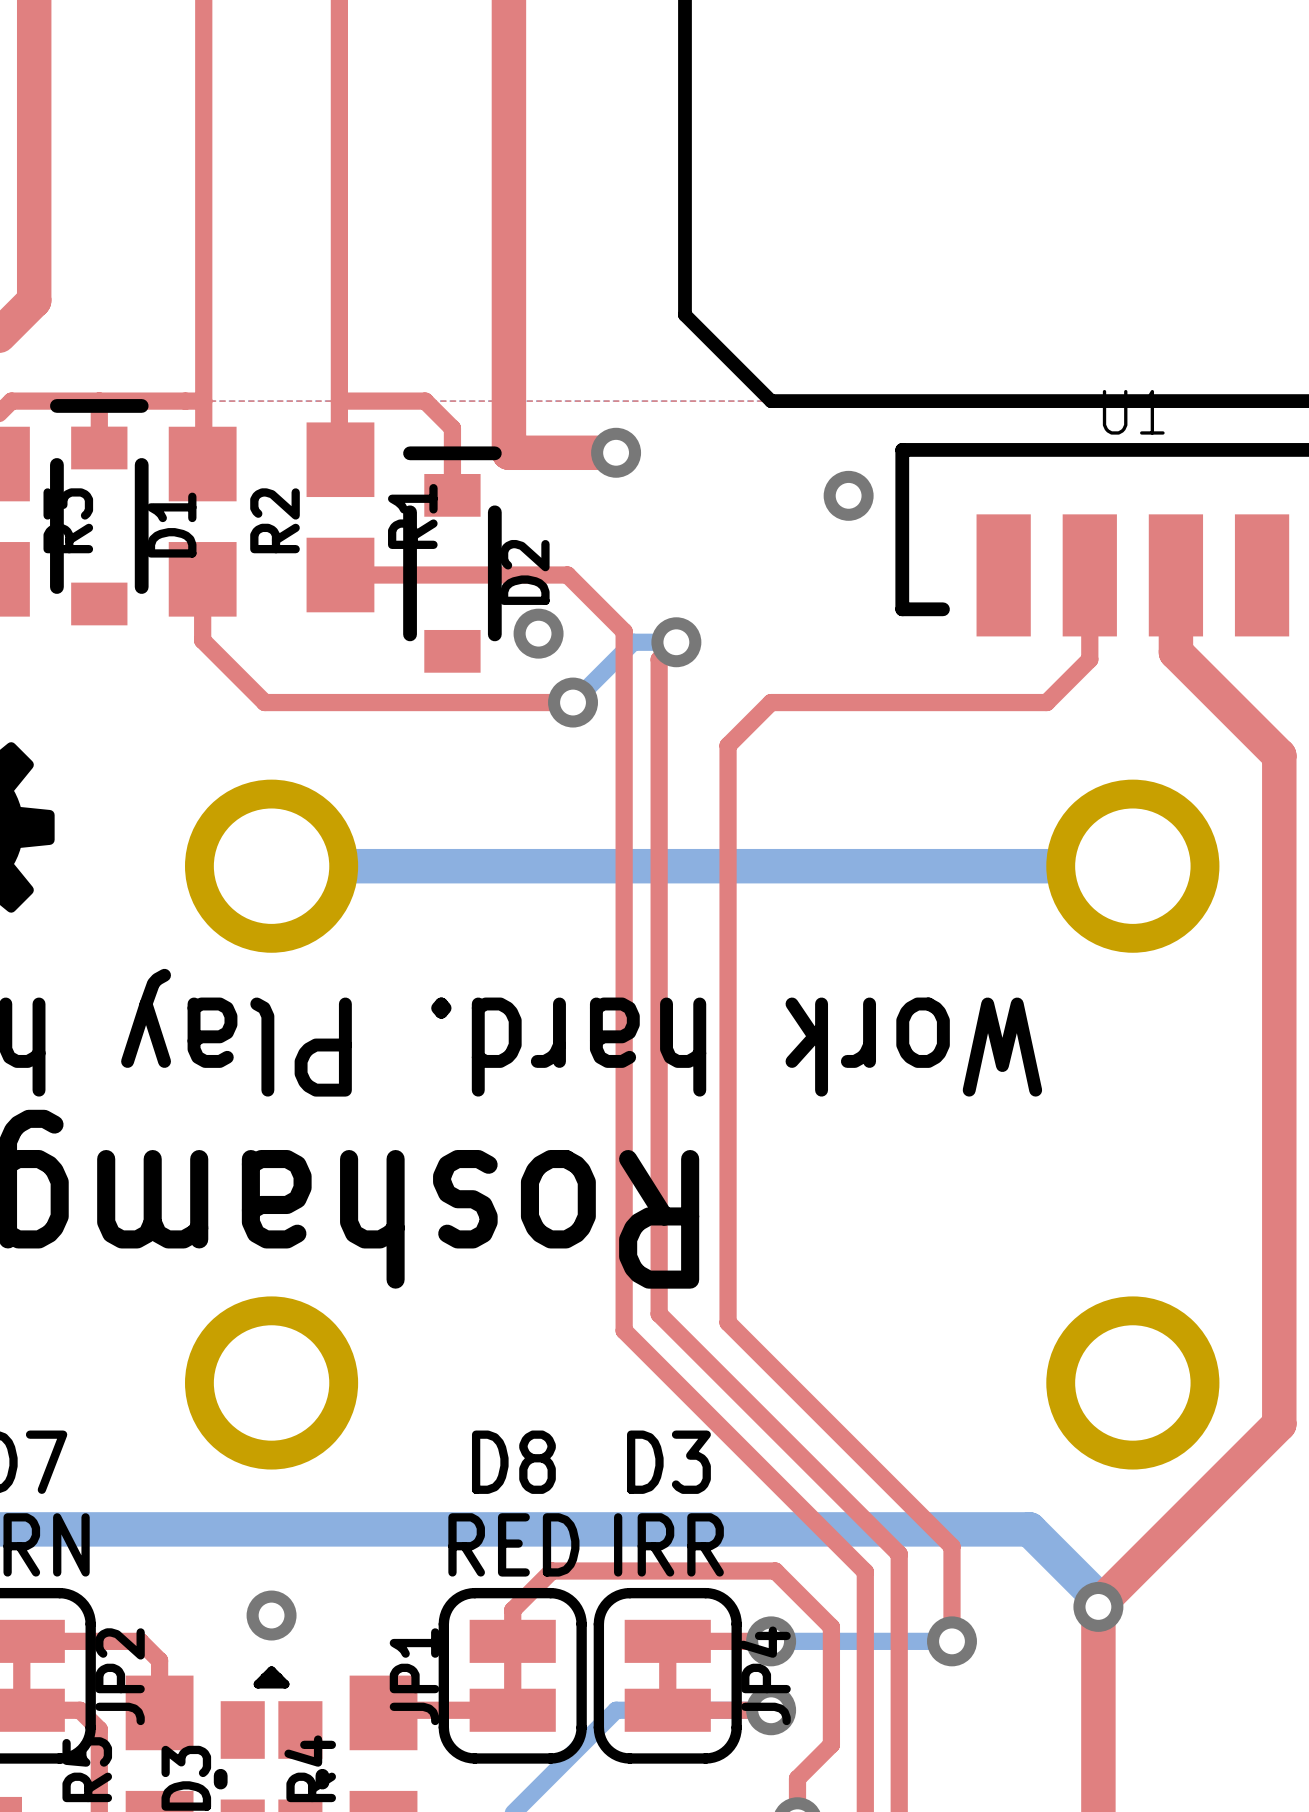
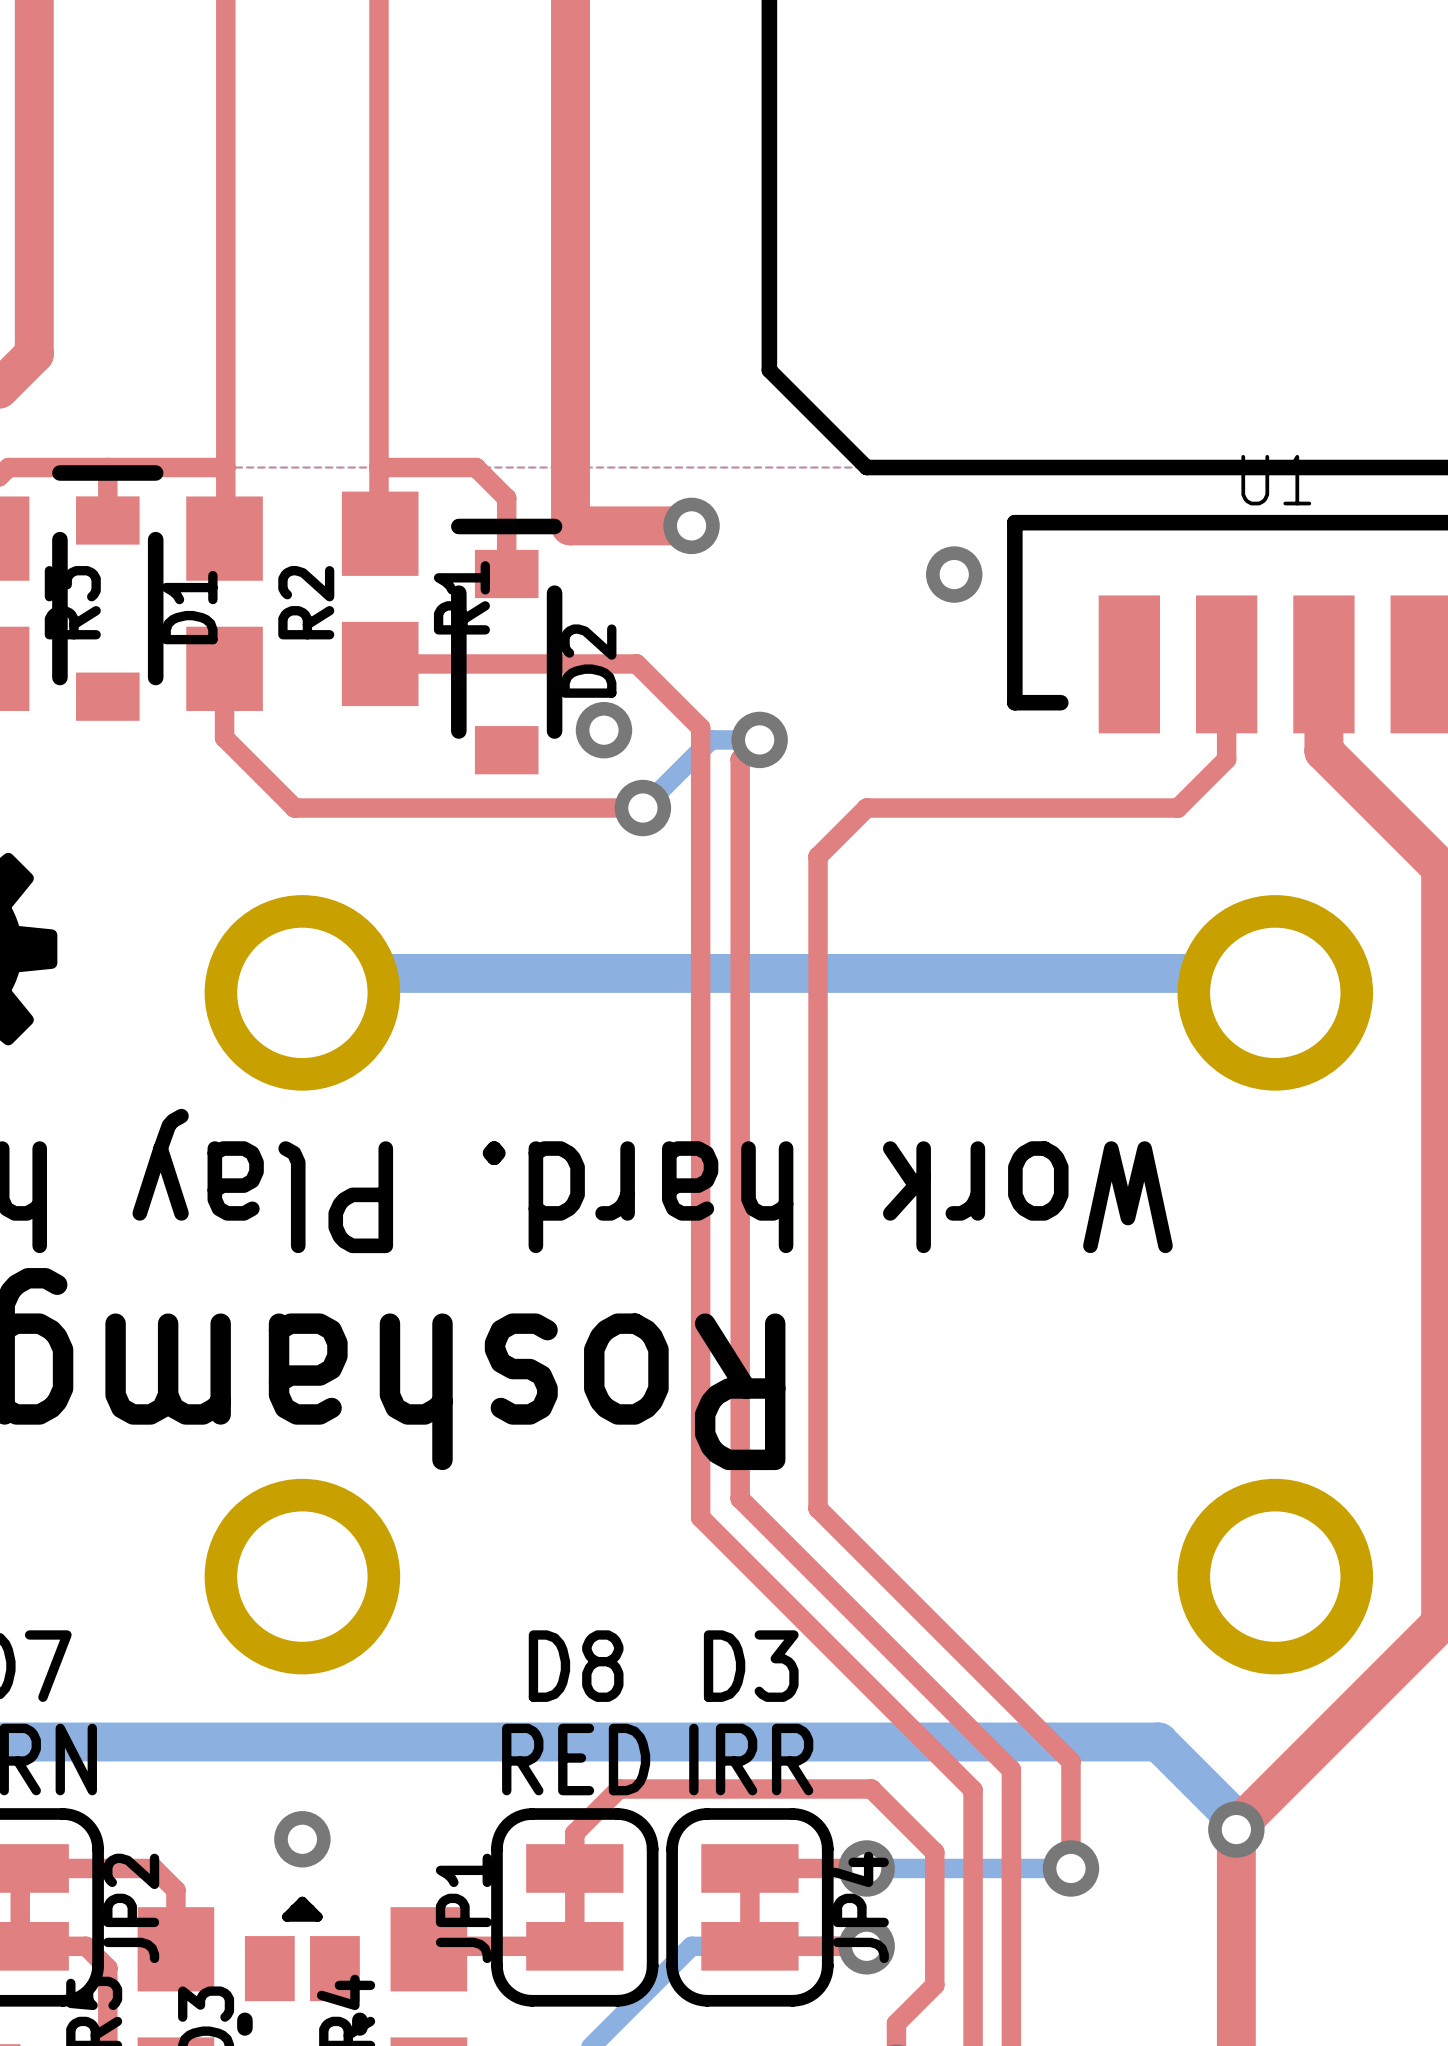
bottom track: (271, 866) (1132, 866) -> (302, 973) (1275, 973)

